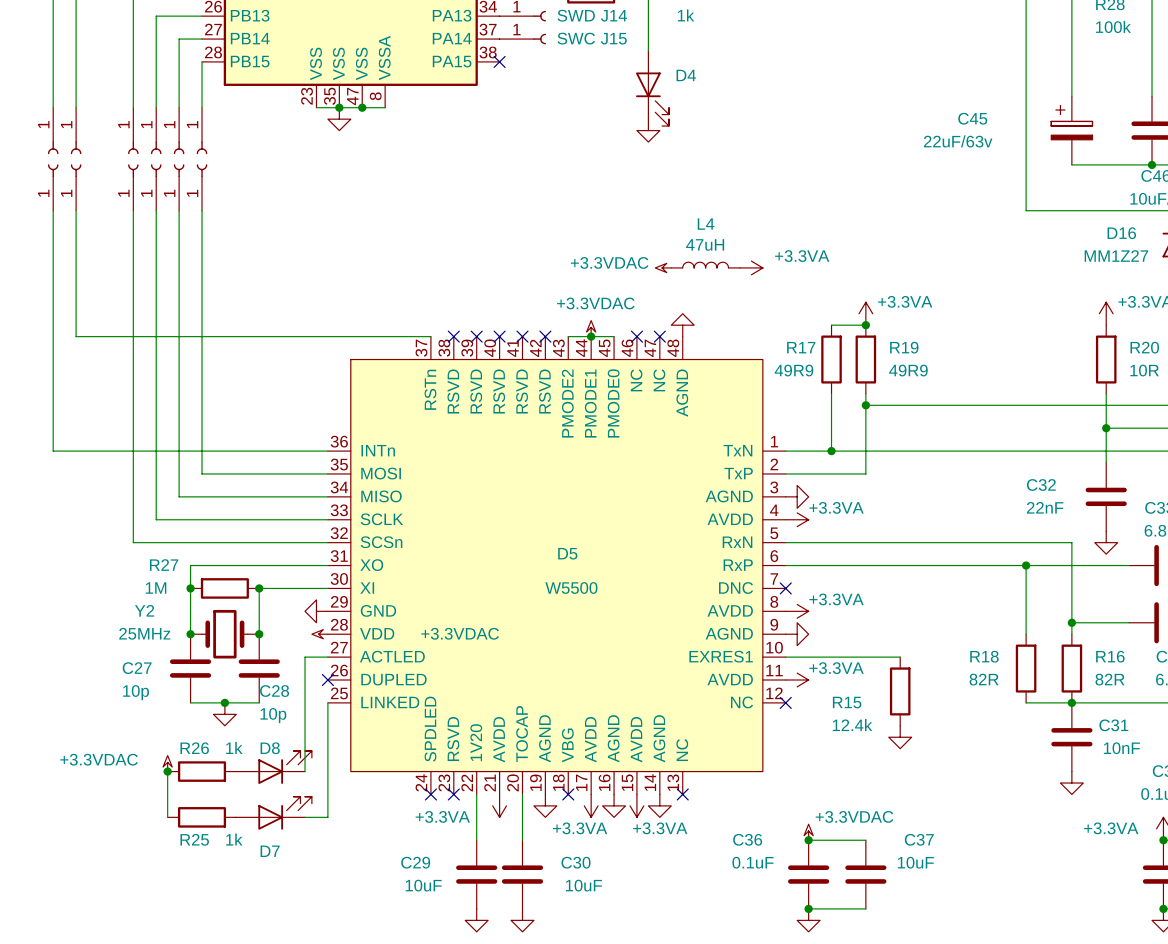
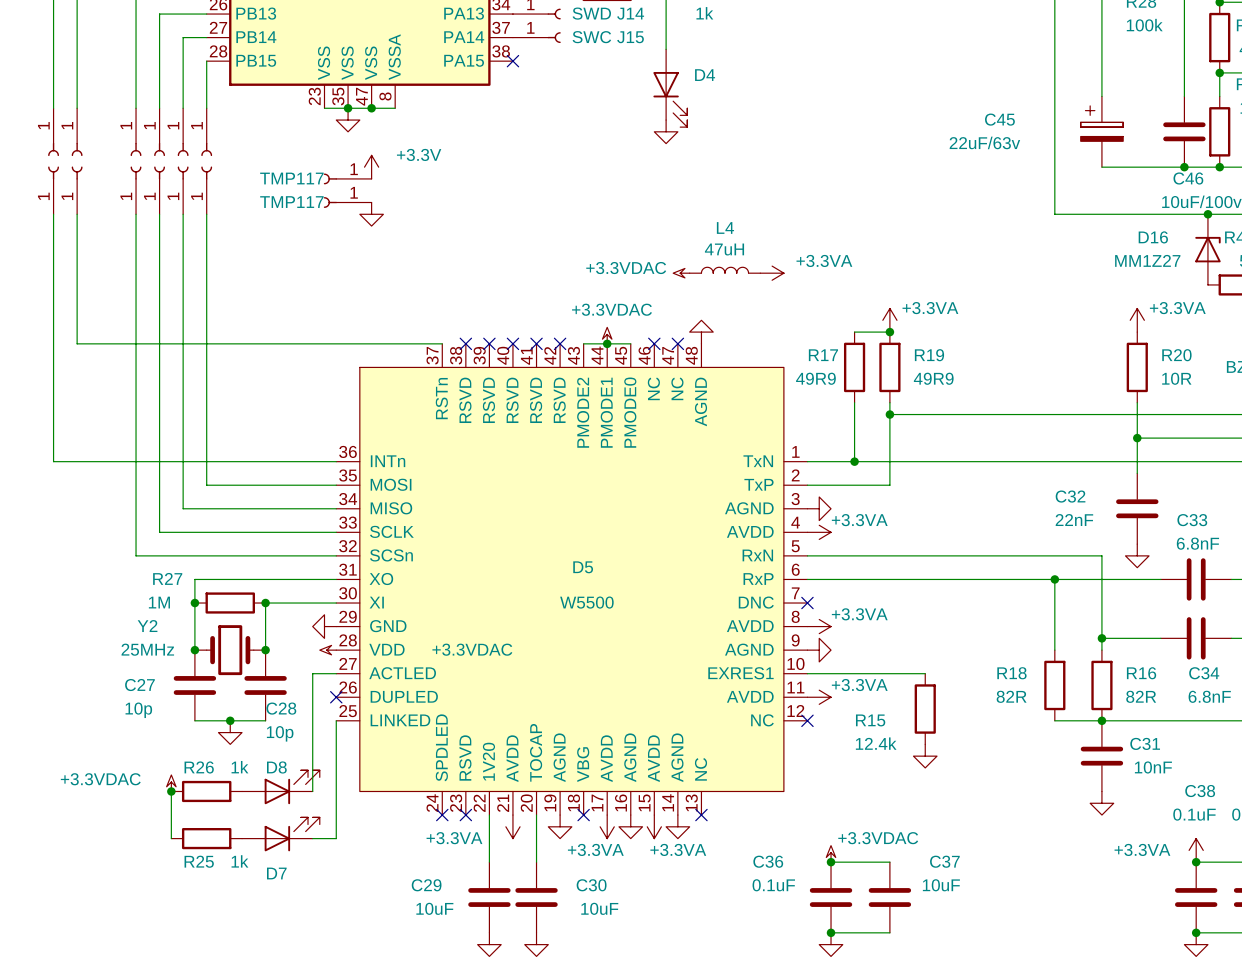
power symbol: none -> +3.3V (371, 167)
part: none -> TMP117 (347, 178)
part: none -> TMP117 (347, 202)
power symbol: none -> (371, 214)

